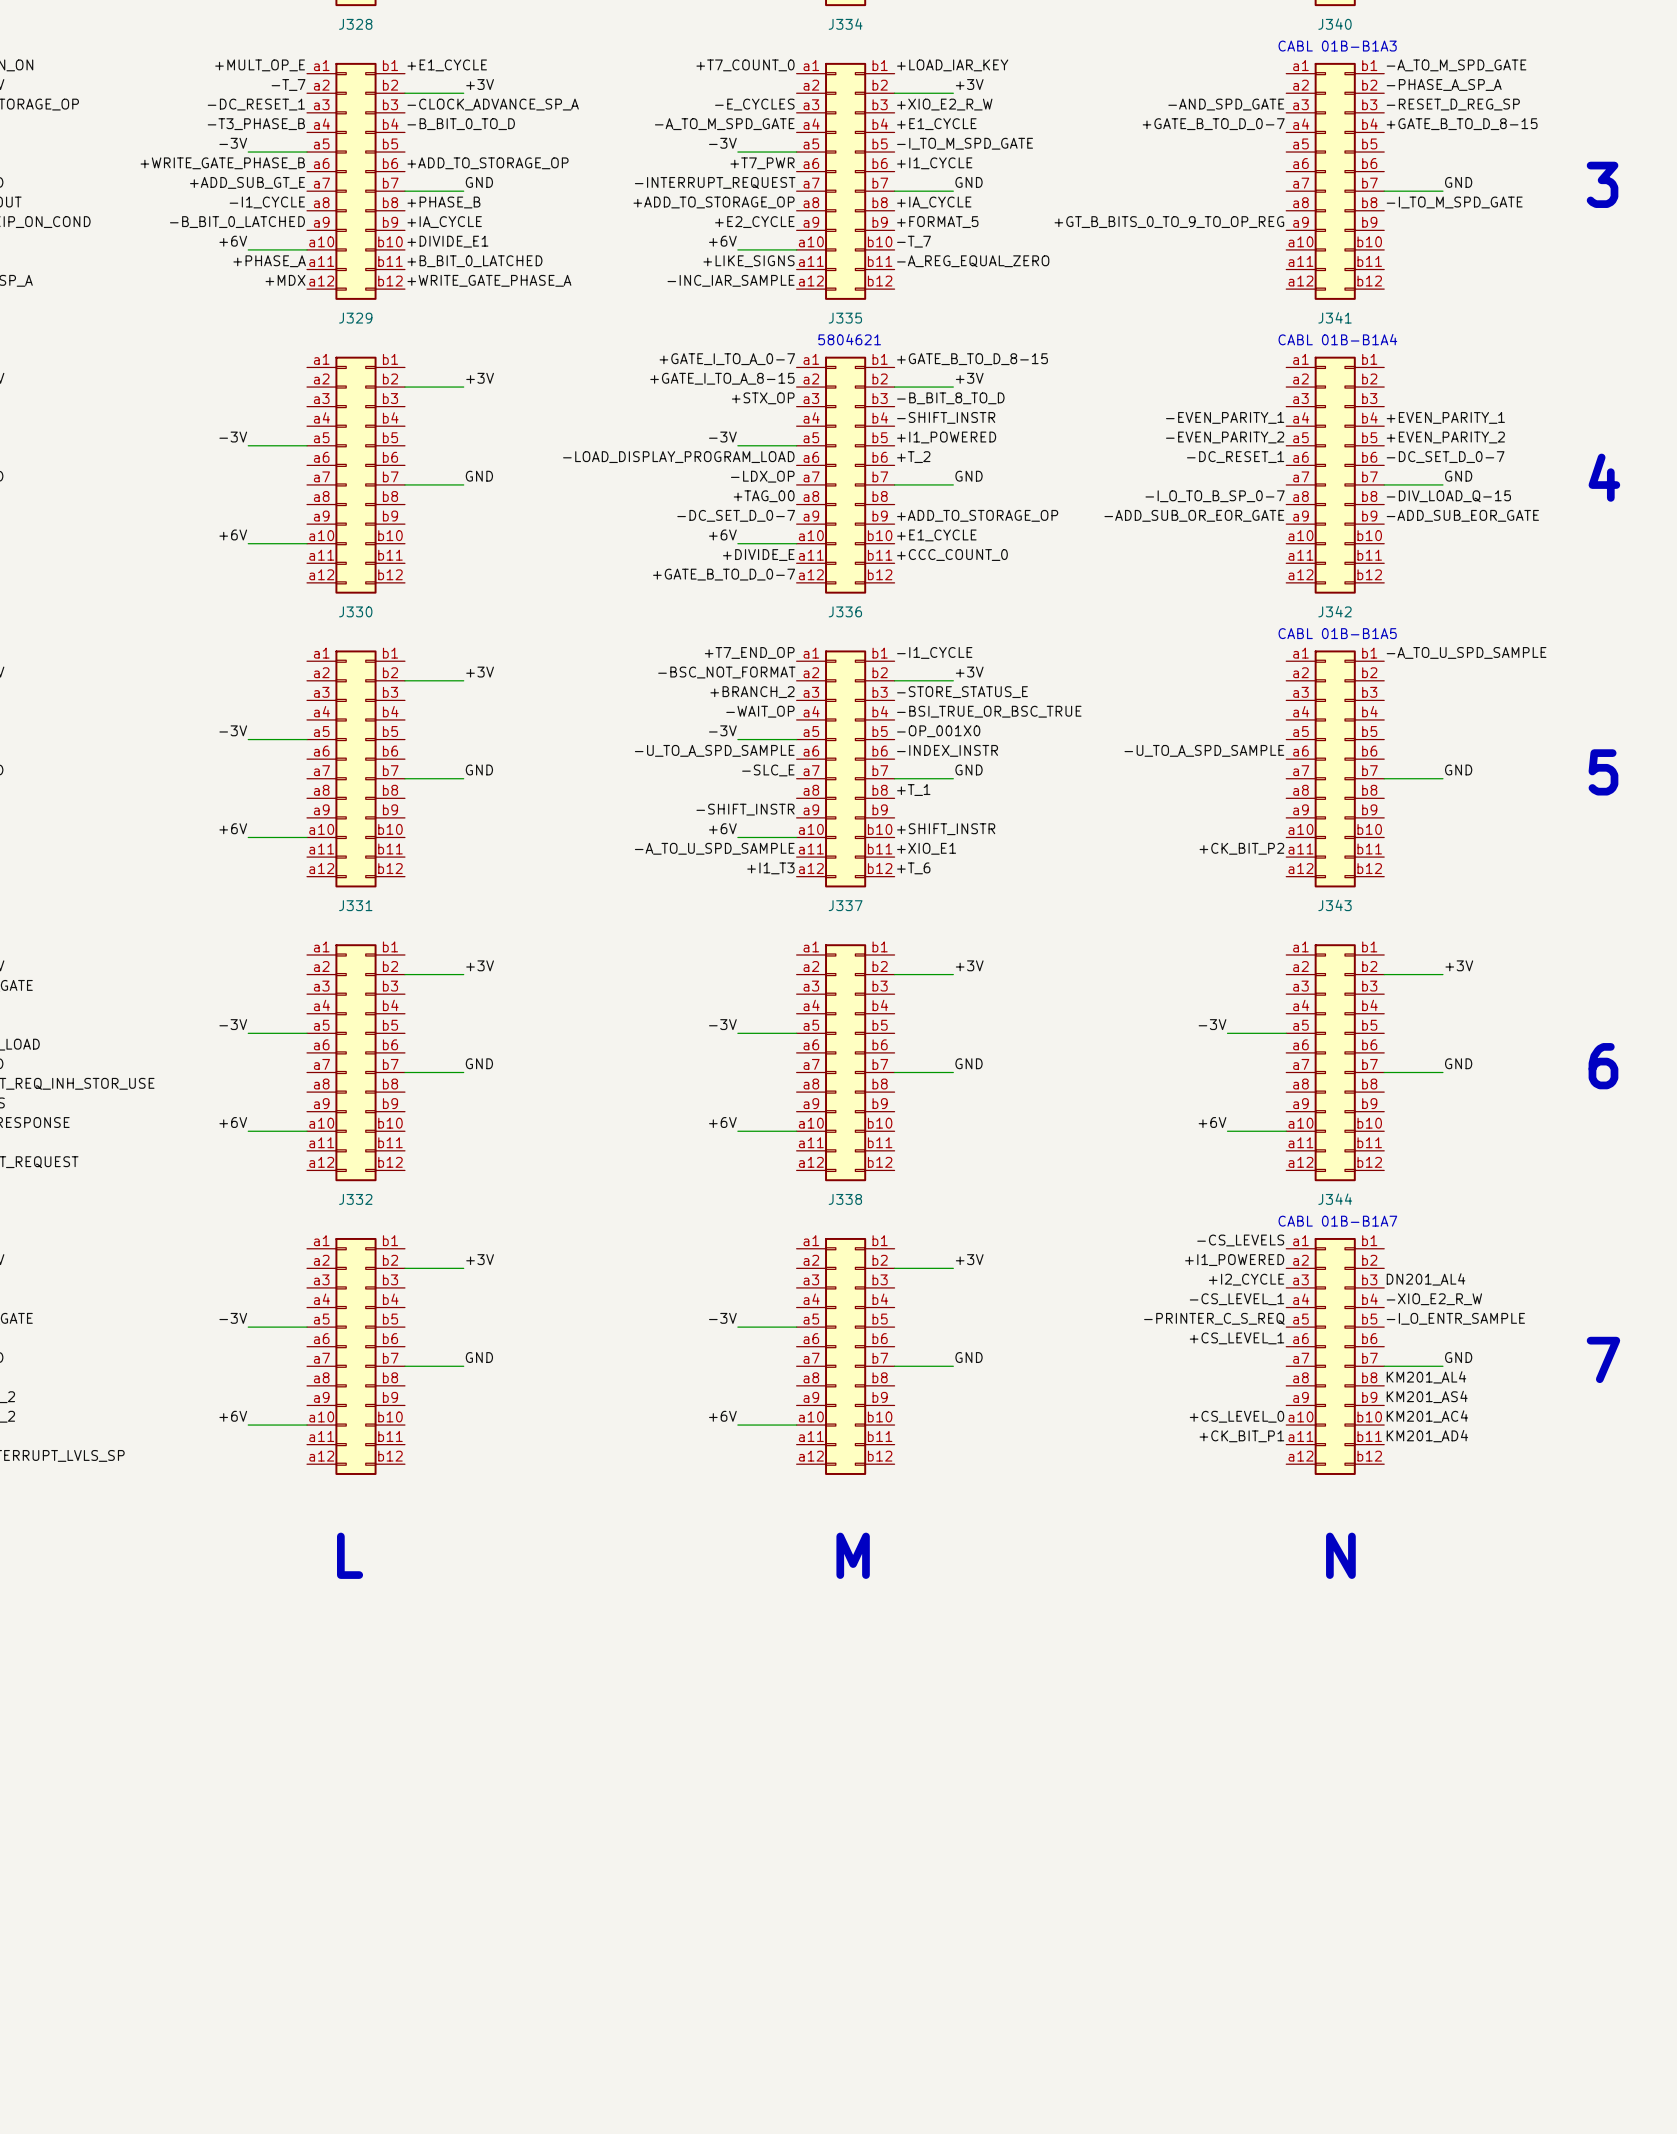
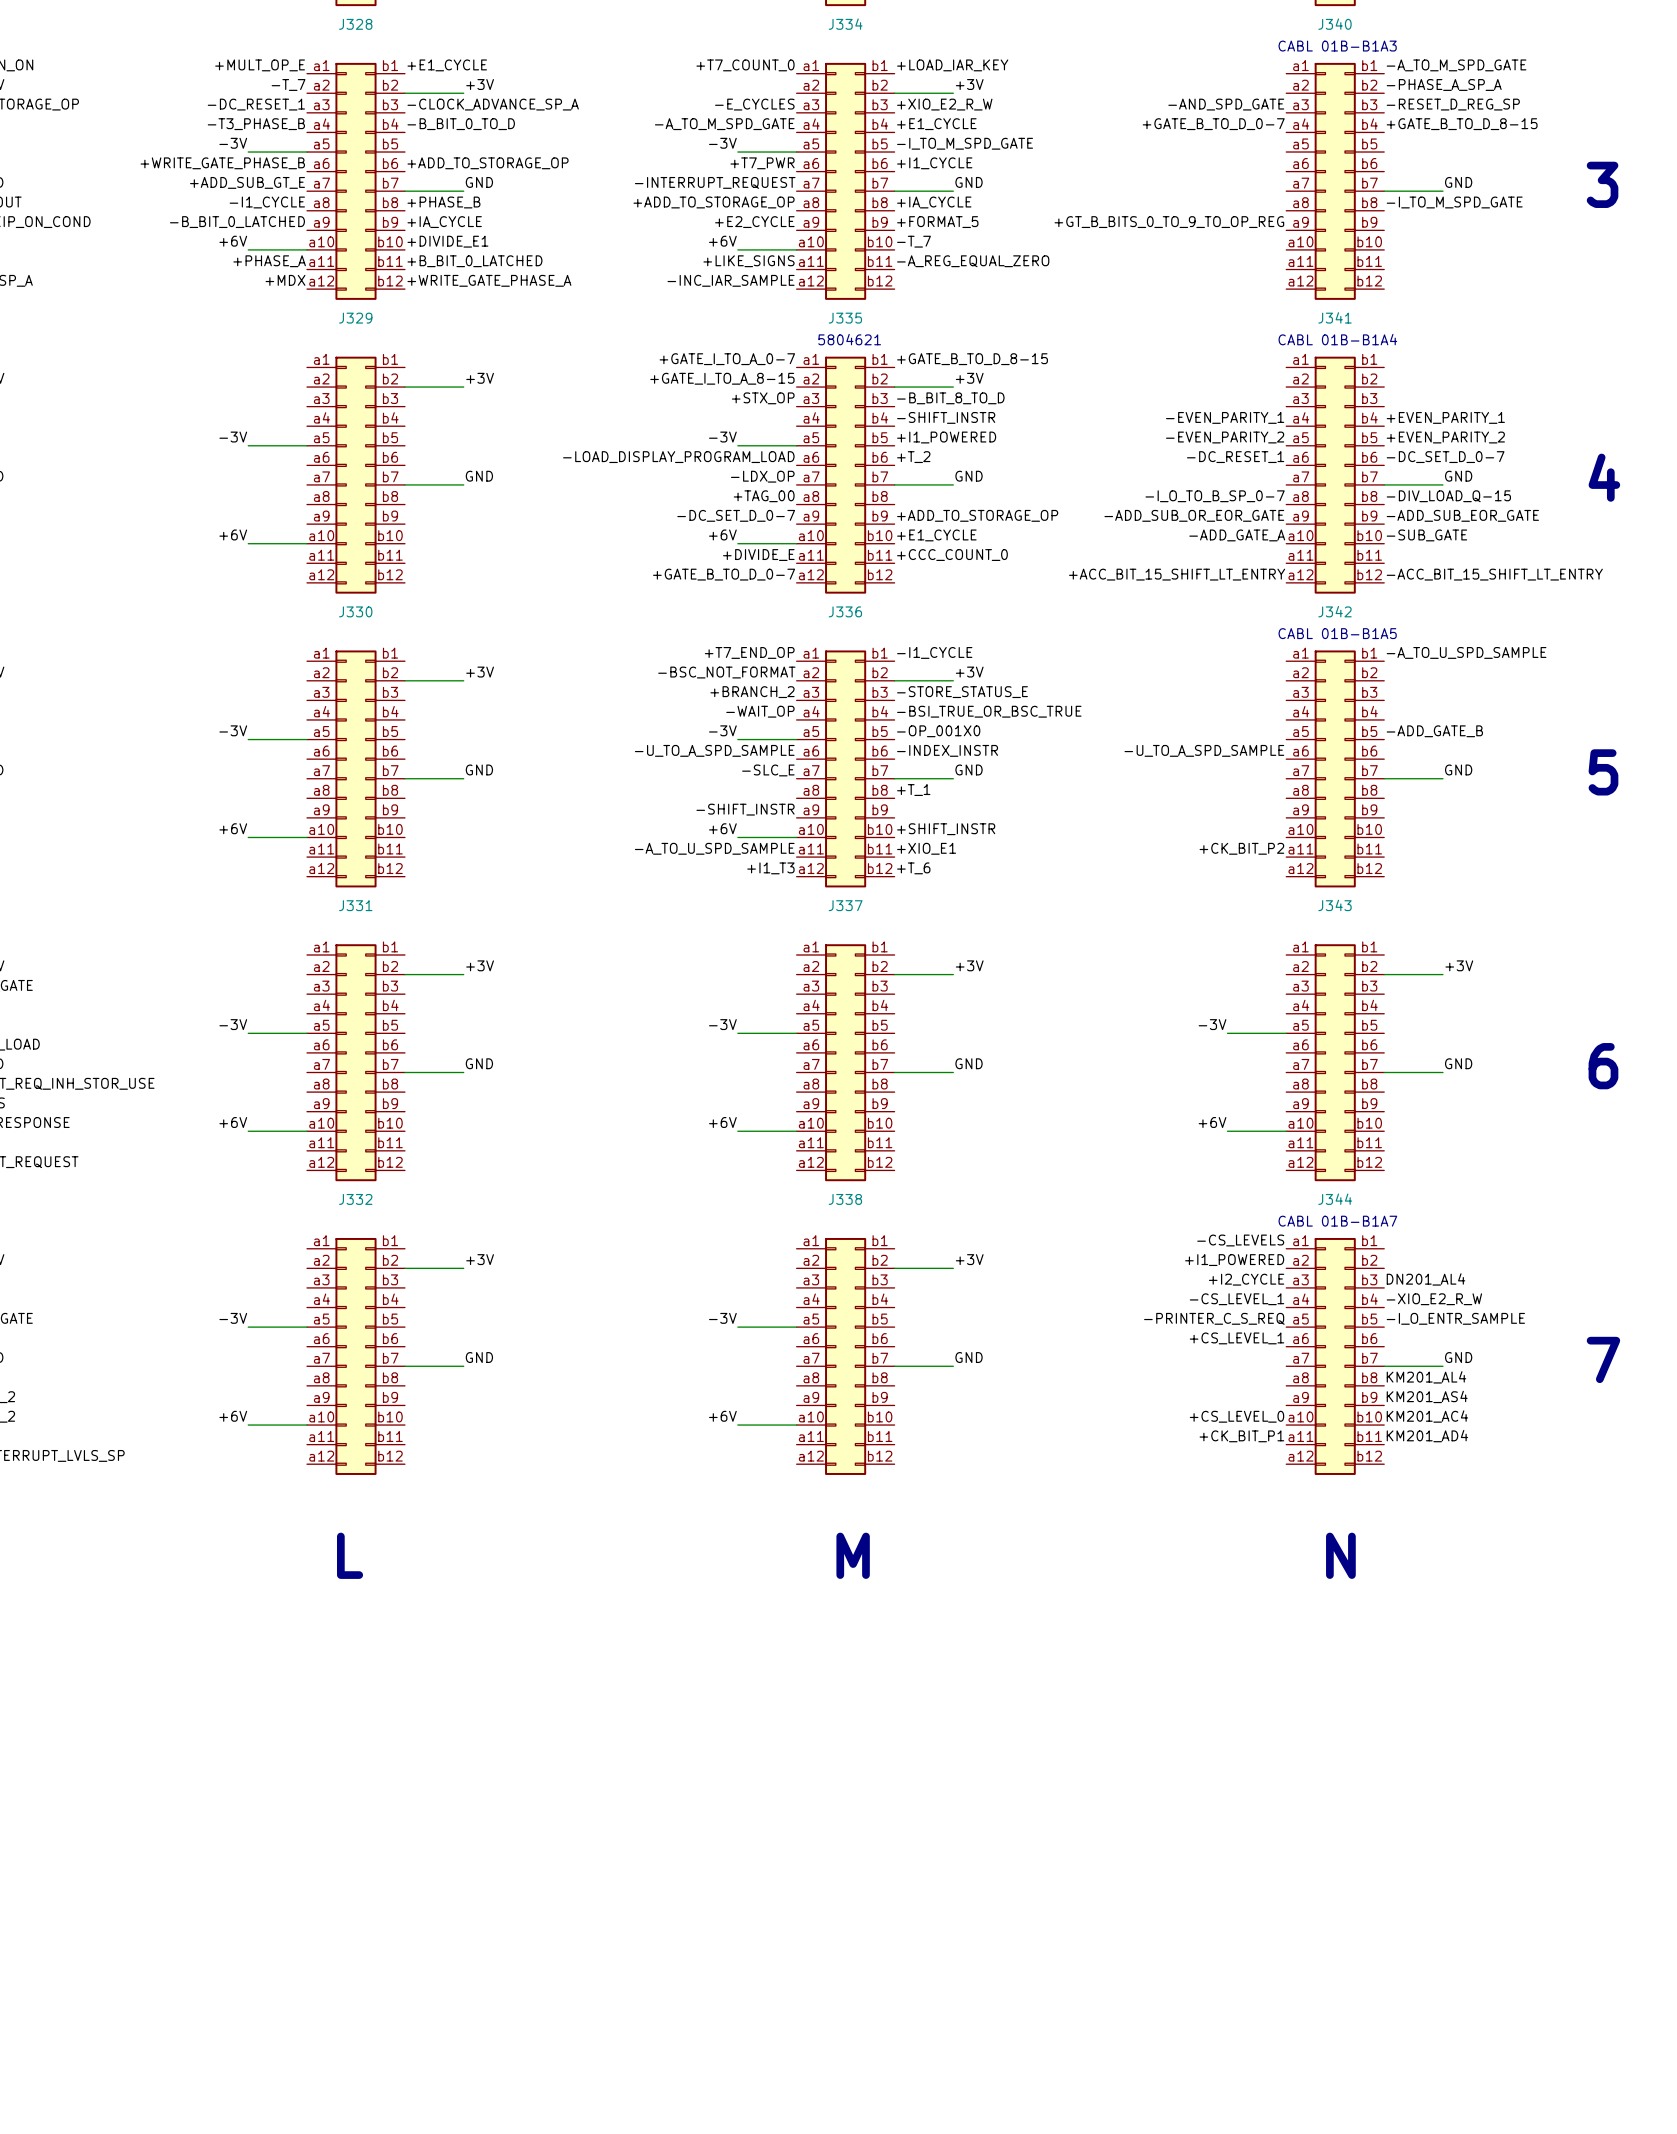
label: none -> -ADD_GATE_A (1237, 535)
label: none -> -SUB_GATE (1426, 535)
label: none -> +ACC_BIT_15_SHIFT_LT_ENTRY (1177, 574)
label: none -> -ACC_BIT_15_SHIFT_LT_ENTRY (1494, 574)
label: none -> -ADD_GATE_B (1434, 731)

